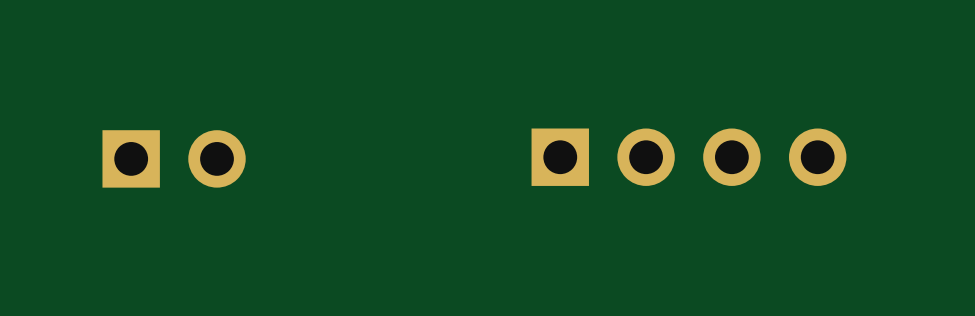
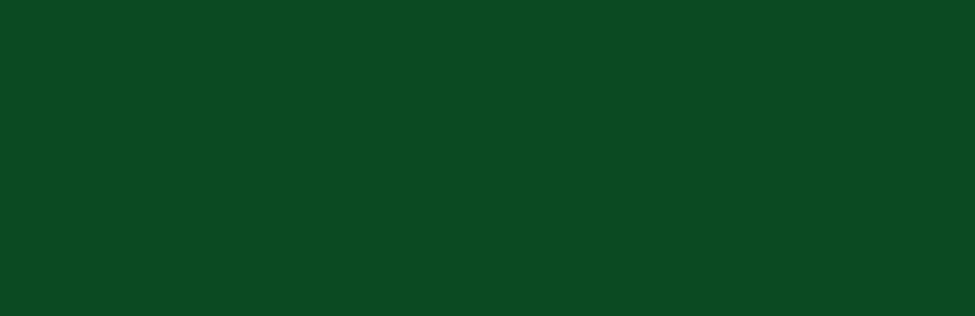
part: (688, 157) -> none
part: (174, 158) -> none

